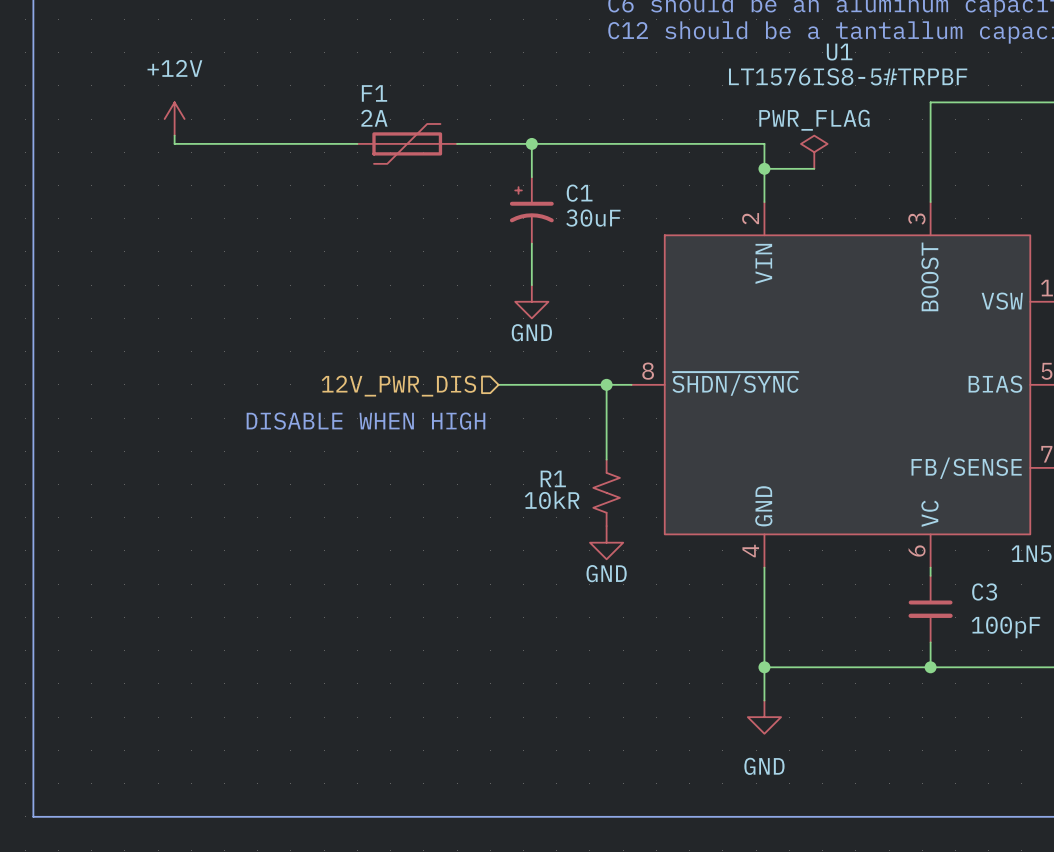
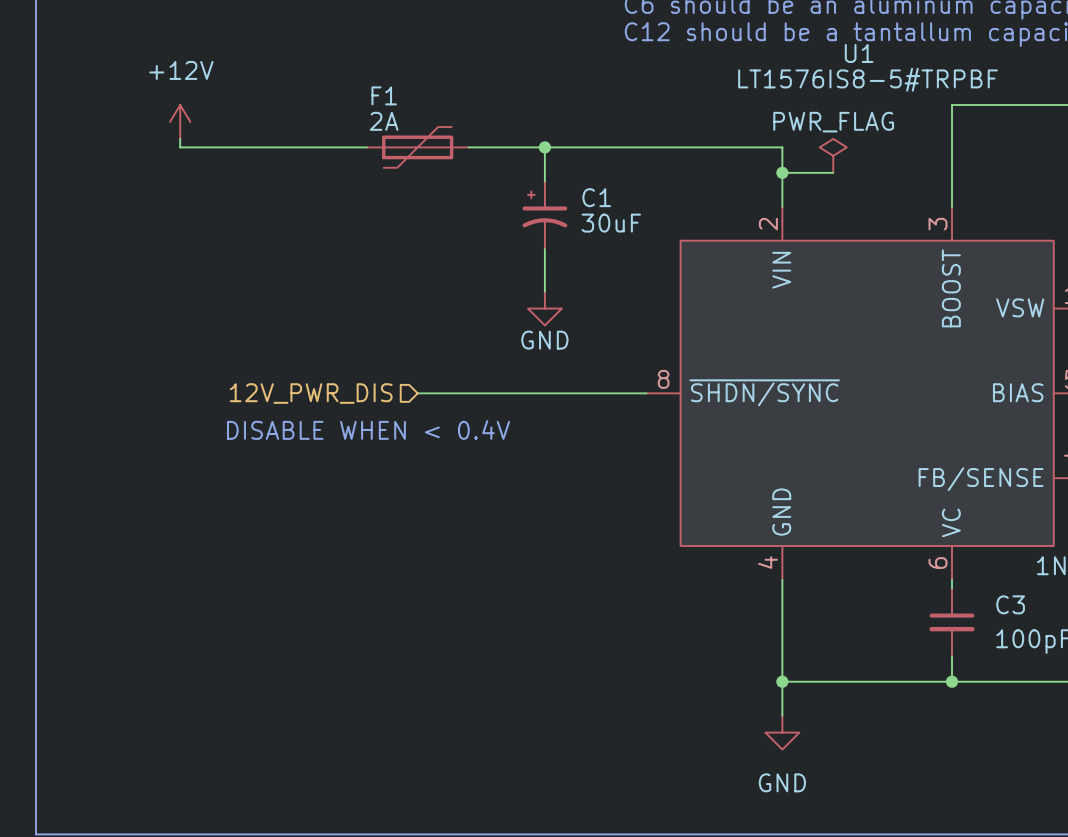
wire: none -> (417, 393) (510, 393)
wire: (606, 384) (606, 459) -> none
junction: (606, 384) -> none
hierarchical label position: 12V_PWR_DIS (398, 386) -> 12V_PWR_DIS (311, 393)
text: DISABLE WHEN HIGH (365, 421) -> DISABLE WHEN < 0.4V (368, 429)
R1: 10kR (606, 492) -> none
power symbol: GND (606, 542) -> none

